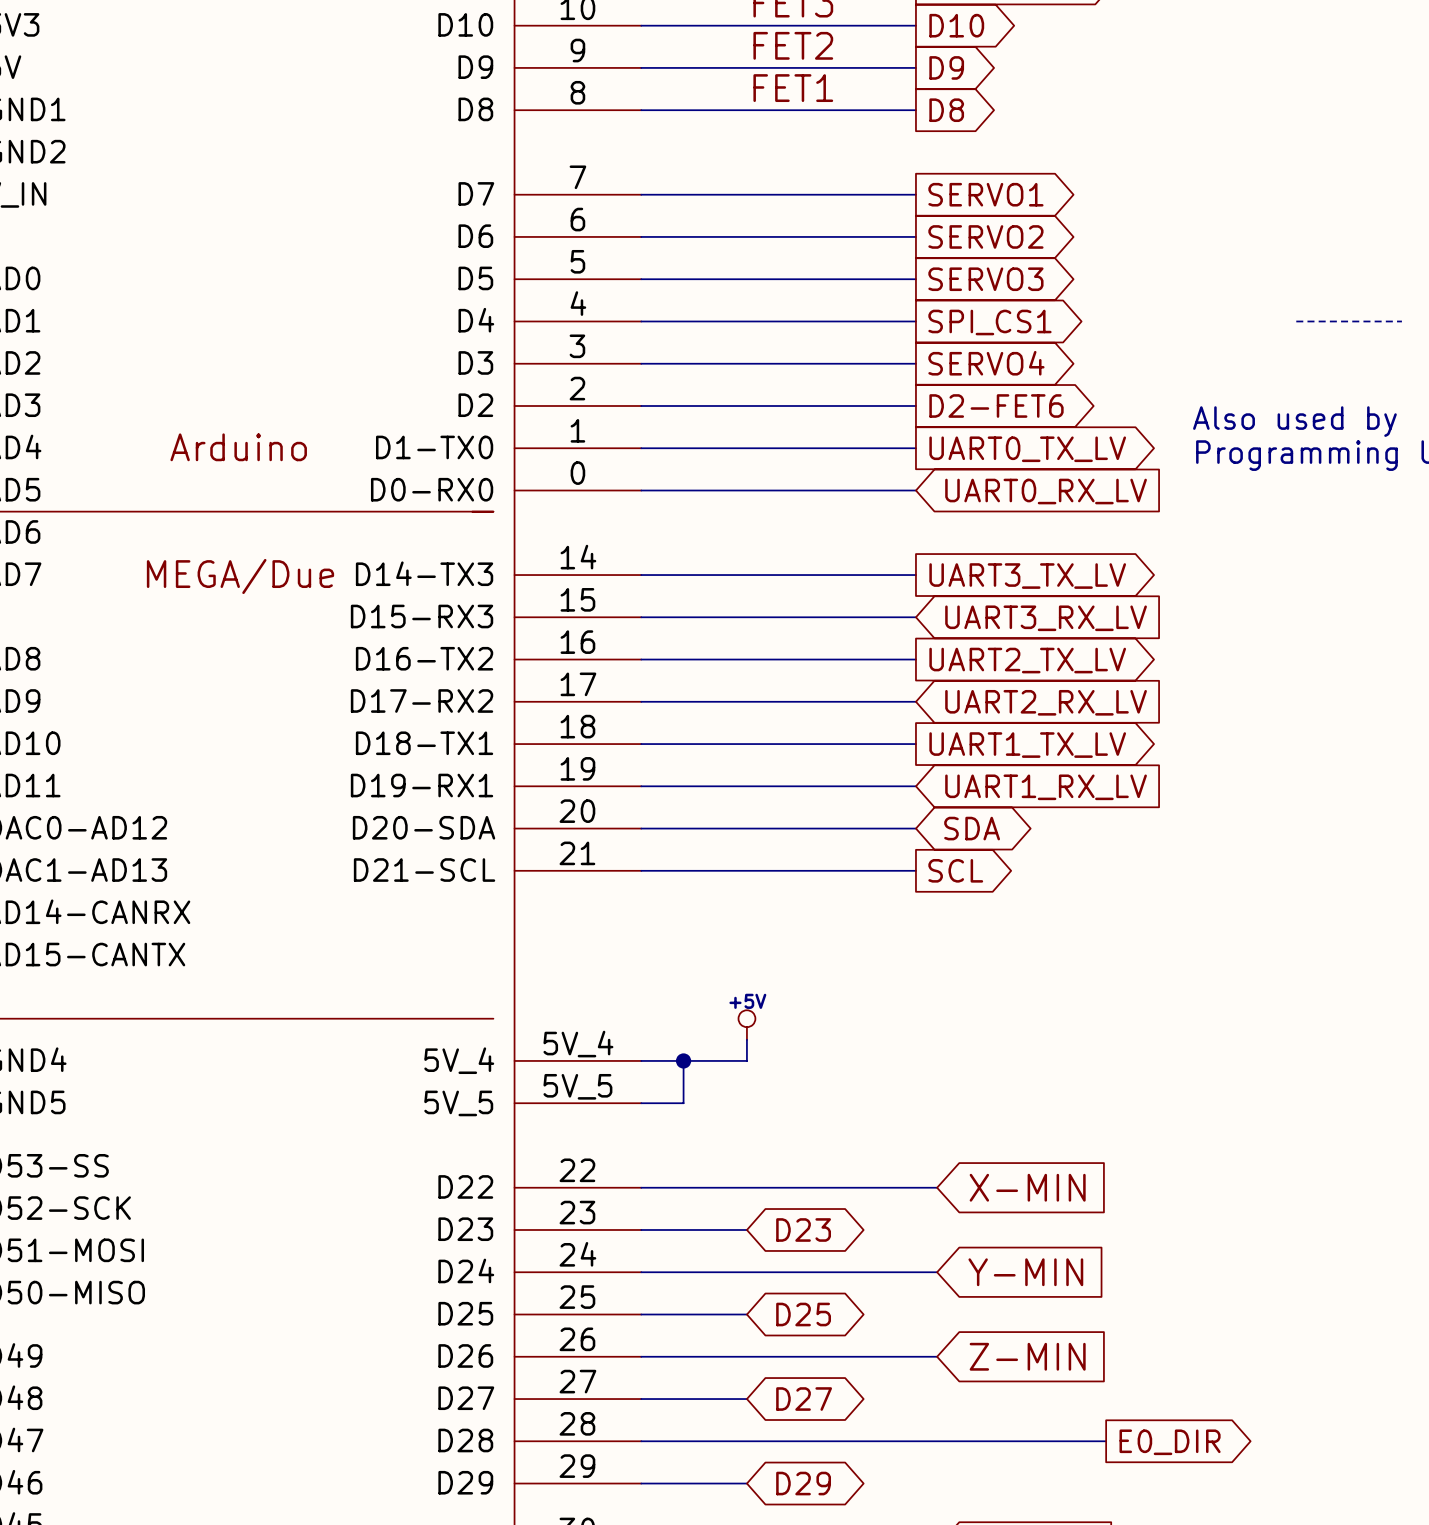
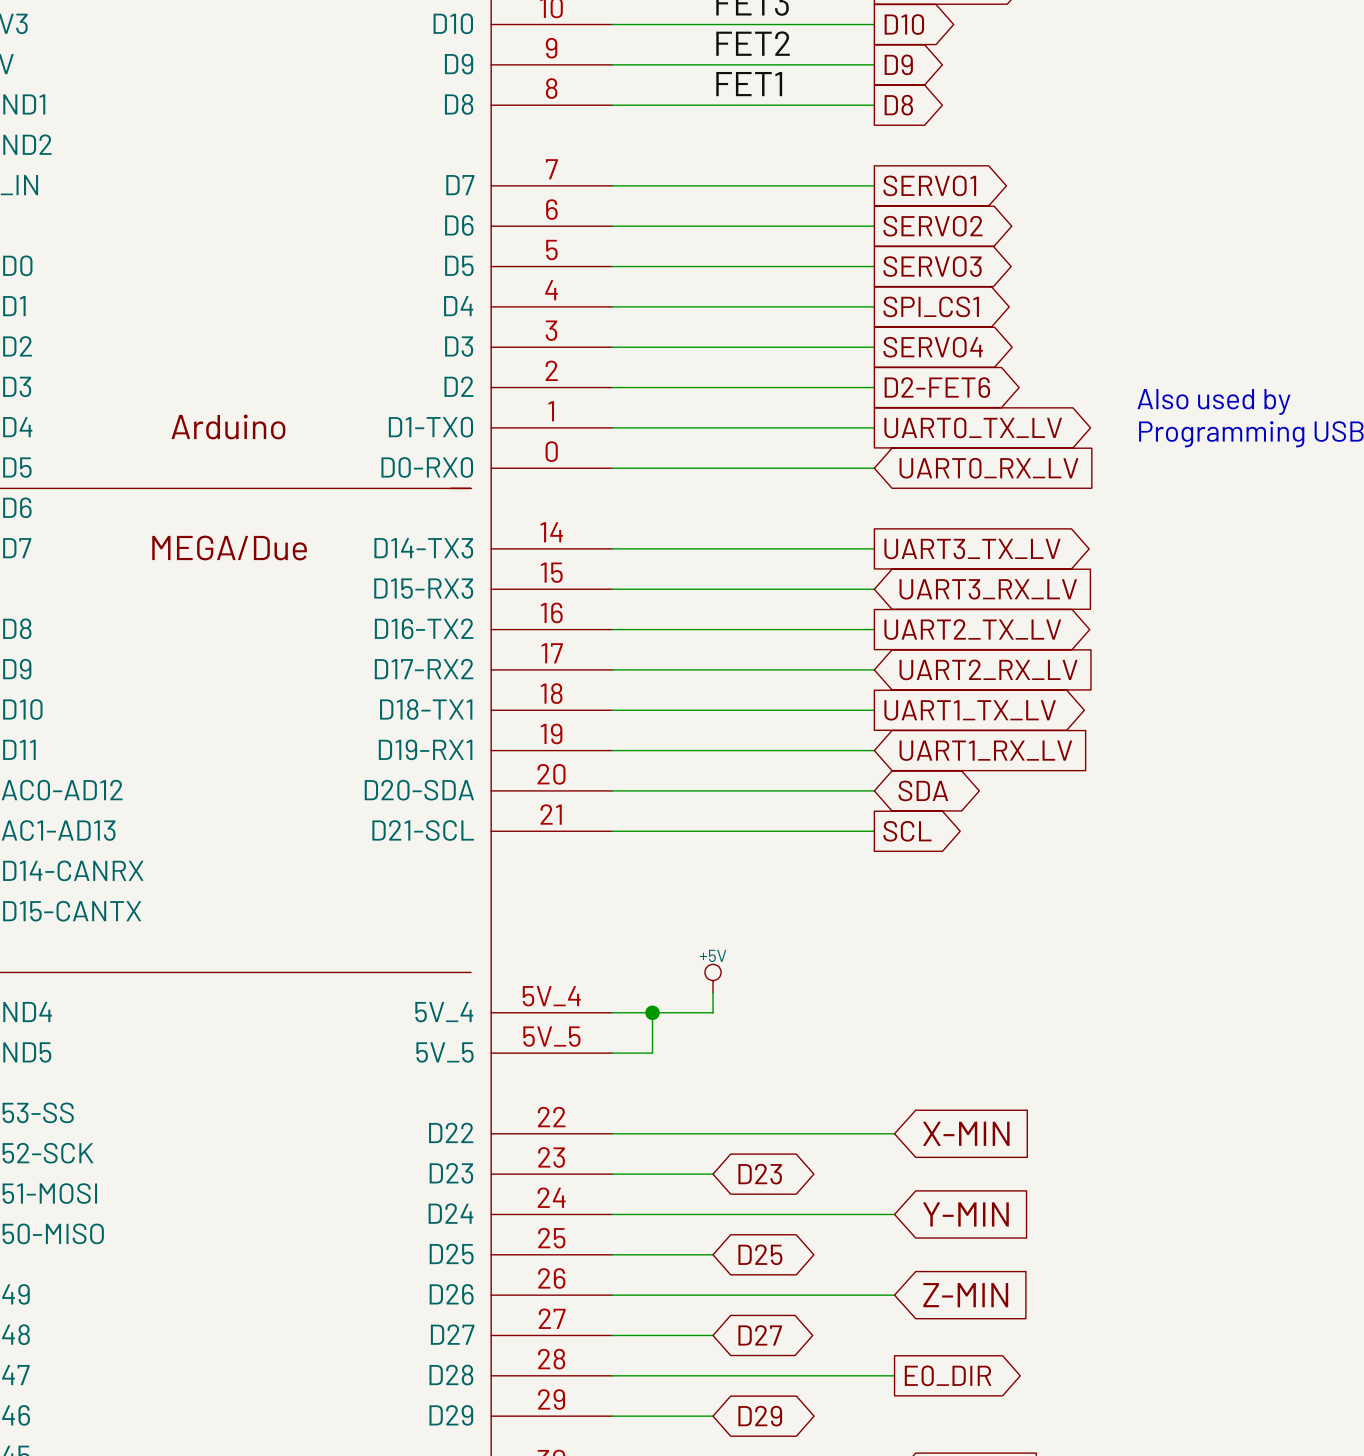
line: (1296, 321) (1401, 321) -> none
wire: (937, 1441) (1106, 1441) -> none
global label position: E0_DIR (1170, 1442) -> E0_DIR (948, 1375)

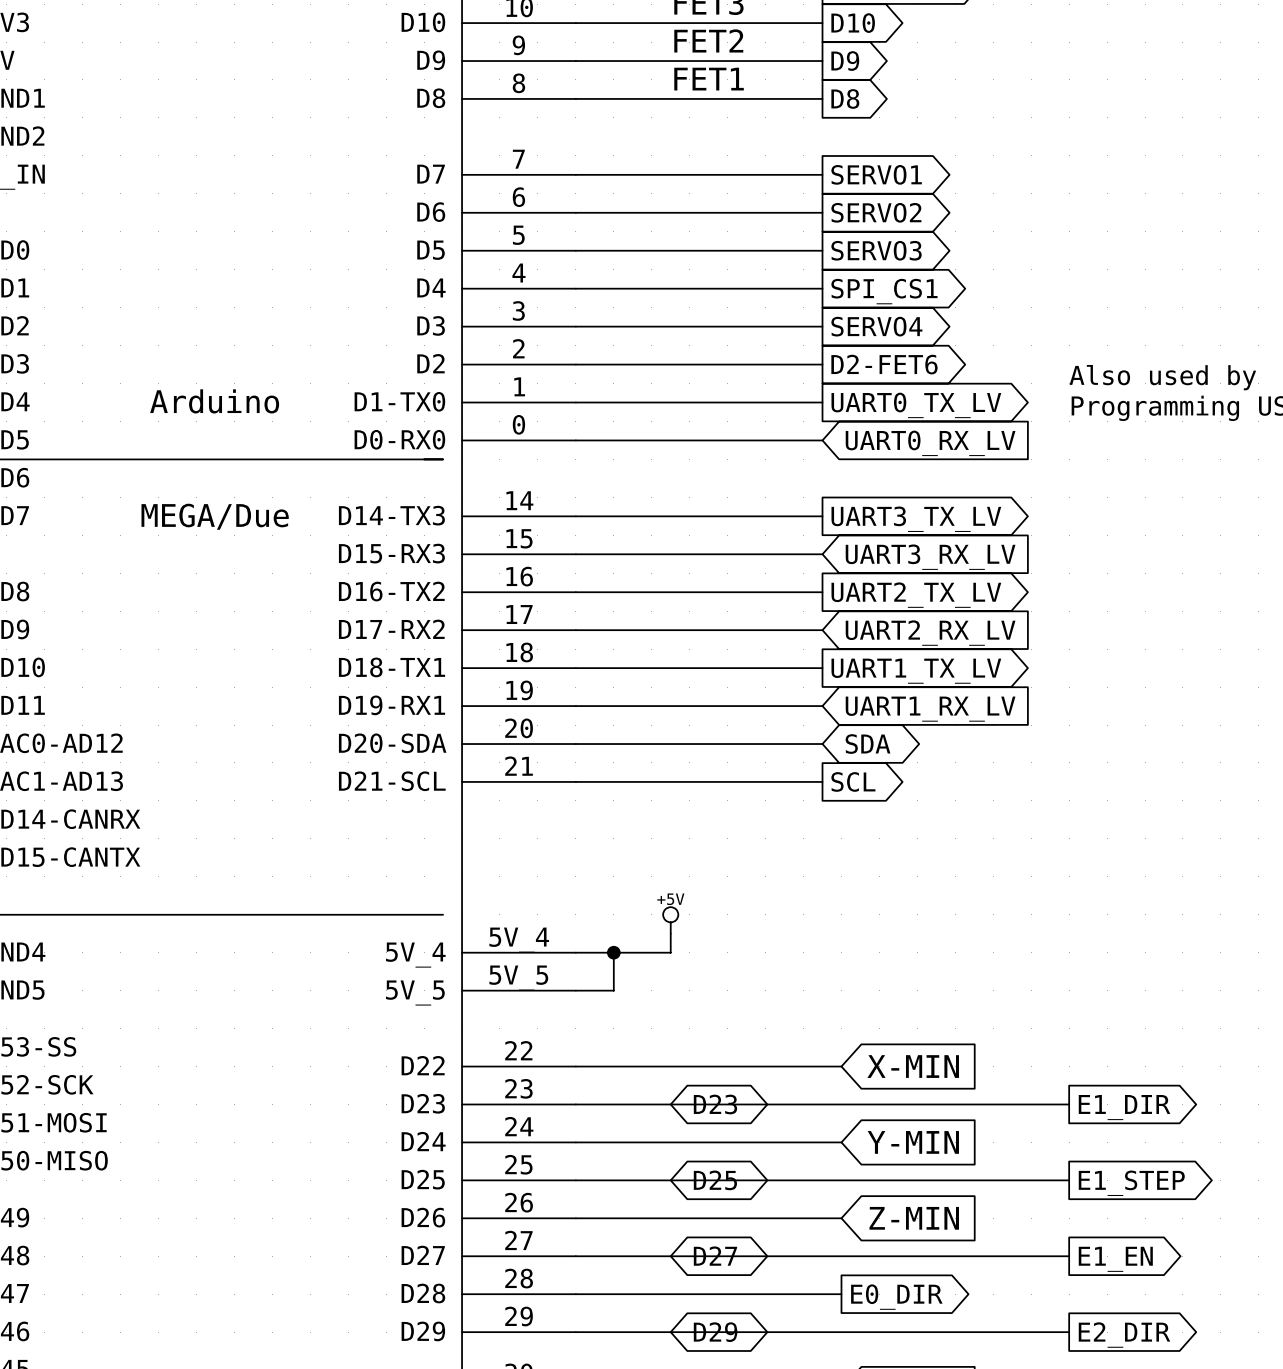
wire: none -> (670, 1104) (1069, 1104)
global label: none -> E1_DIR (1124, 1107)
wire: none -> (670, 1180) (1069, 1180)
global label: none -> E1_STEP (1131, 1183)
wire: none -> (670, 1256) (1069, 1256)
global label: none -> E1_EN (1115, 1259)
wire: none -> (670, 1332) (1069, 1332)
global label: none -> E2_DIR (1124, 1335)

